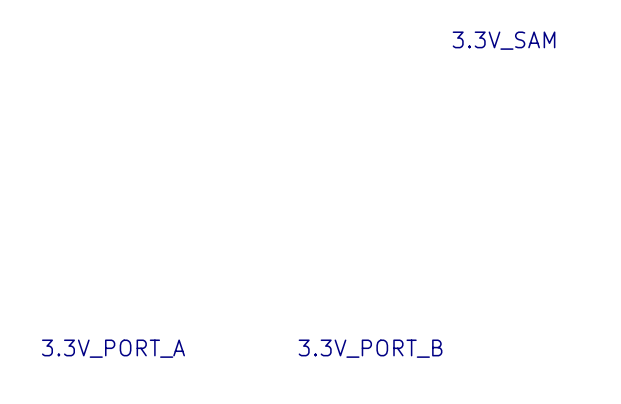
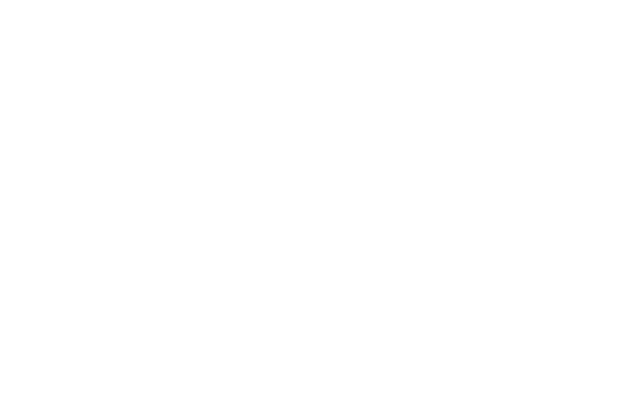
text: 3.3V_SAM (504, 40) -> none
text: 3.3V_PORT_A (113, 348) -> none
text: 3.3V_PORT_B (370, 348) -> none

